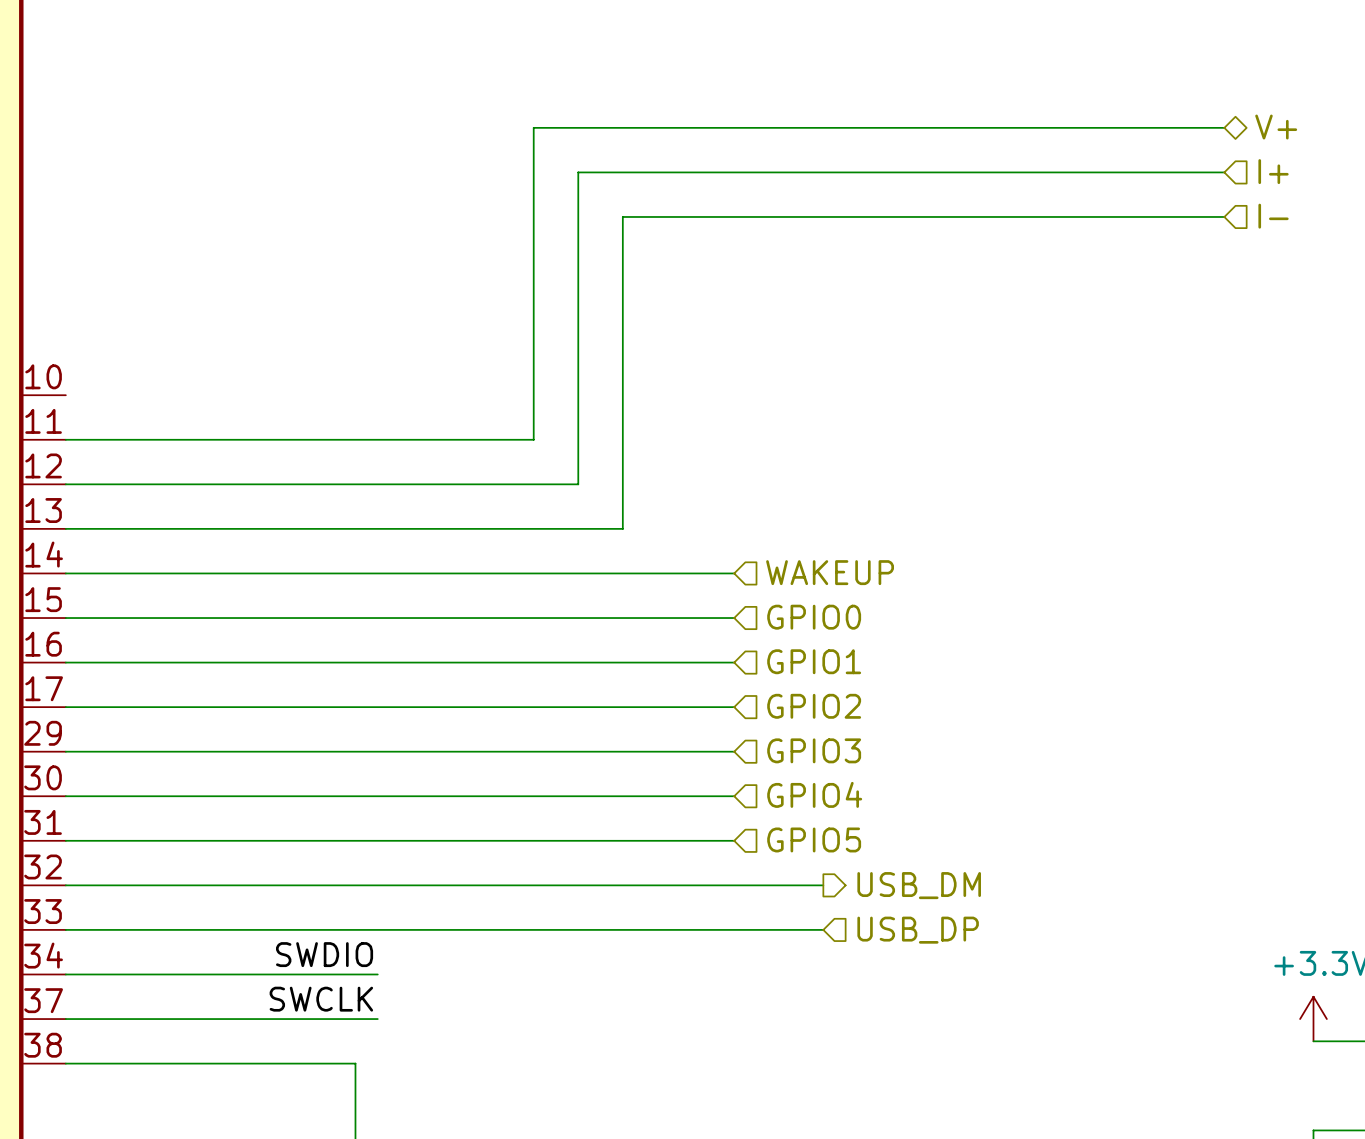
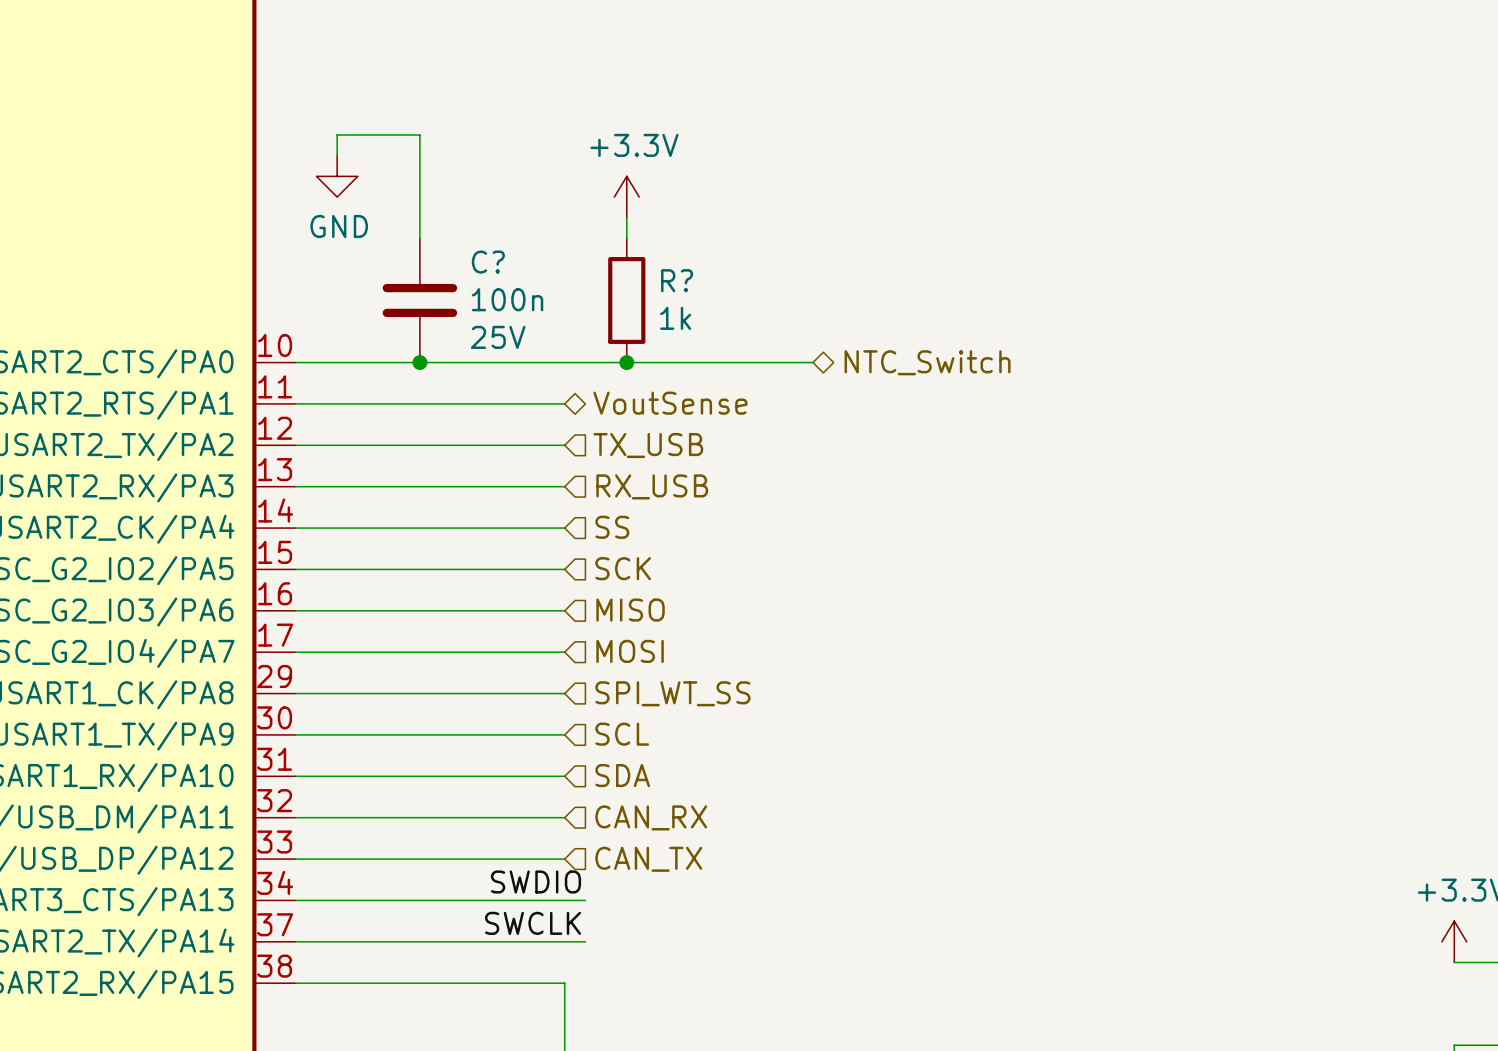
wire: (1224, 127) (533, 127) (533, 439) (355, 439) -> none
hierarchical label: V+ (1276, 127) -> none
hierarchical label: I+ (1273, 171) -> none
wire: none -> (337, 155) (337, 135) (419, 135) (419, 238)
wire: (1224, 172) (578, 172) (578, 484) (355, 484) -> none
power symbol: none -> GND (337, 176)
power symbol: none -> +3.3V (626, 197)
wire: (1224, 216) (622, 216) (622, 528) (355, 528) -> none
hierarchical label: I- (1273, 216) -> none
wire: none -> (626, 217) (626, 238)
C?: none -> 100n (419, 300)
R?: none -> 1k (626, 300)
wire: none -> (295, 362) (812, 362)
junction: none -> (419, 362)
junction: none -> (626, 362)
hierarchical label: none -> NTC_Switch (927, 362)
hierarchical label: none -> VoutSense (670, 403)
hierarchical label: none -> TX_USB (648, 445)
hierarchical label: none -> RX_USB (652, 486)
hierarchical label: none -> SS (612, 527)
hierarchical label: WAKEUP (830, 572) -> none
wire: (355, 573) (734, 573) -> none
hierarchical label: none -> SCK (623, 568)
hierarchical label: GPIO0 (814, 617) -> none
wire: (355, 618) (734, 618) -> none
hierarchical label: none -> MISO (630, 610)
hierarchical label: GPIO1 (814, 661) -> none
wire: (355, 662) (734, 662) -> none
hierarchical label: none -> MOSI (630, 651)
hierarchical label: GPIO2 (814, 706) -> none
wire: (355, 707) (734, 707) -> none
hierarchical label: GPIO3 (814, 750) -> none
wire: (355, 751) (734, 751) -> none
hierarchical label: none -> SPI_WT_SS (672, 693)
hierarchical label: GPIO4 (814, 794) -> none
hierarchical label: none -> SCL (622, 734)
wire: (355, 796) (734, 796) -> none
hierarchical label: none -> SDA (622, 775)
hierarchical label: GPIO5 (814, 839) -> none
wire: (355, 840) (734, 840) -> none
wire: (355, 885) (823, 885) -> none
hierarchical label: none -> CAN_RX (651, 817)
hierarchical label: USB_DM (919, 885) -> none
wire: (355, 929) (823, 929) -> none
hierarchical label: none -> CAN_TX (648, 859)
hierarchical label: USB_DP (918, 930) -> none

